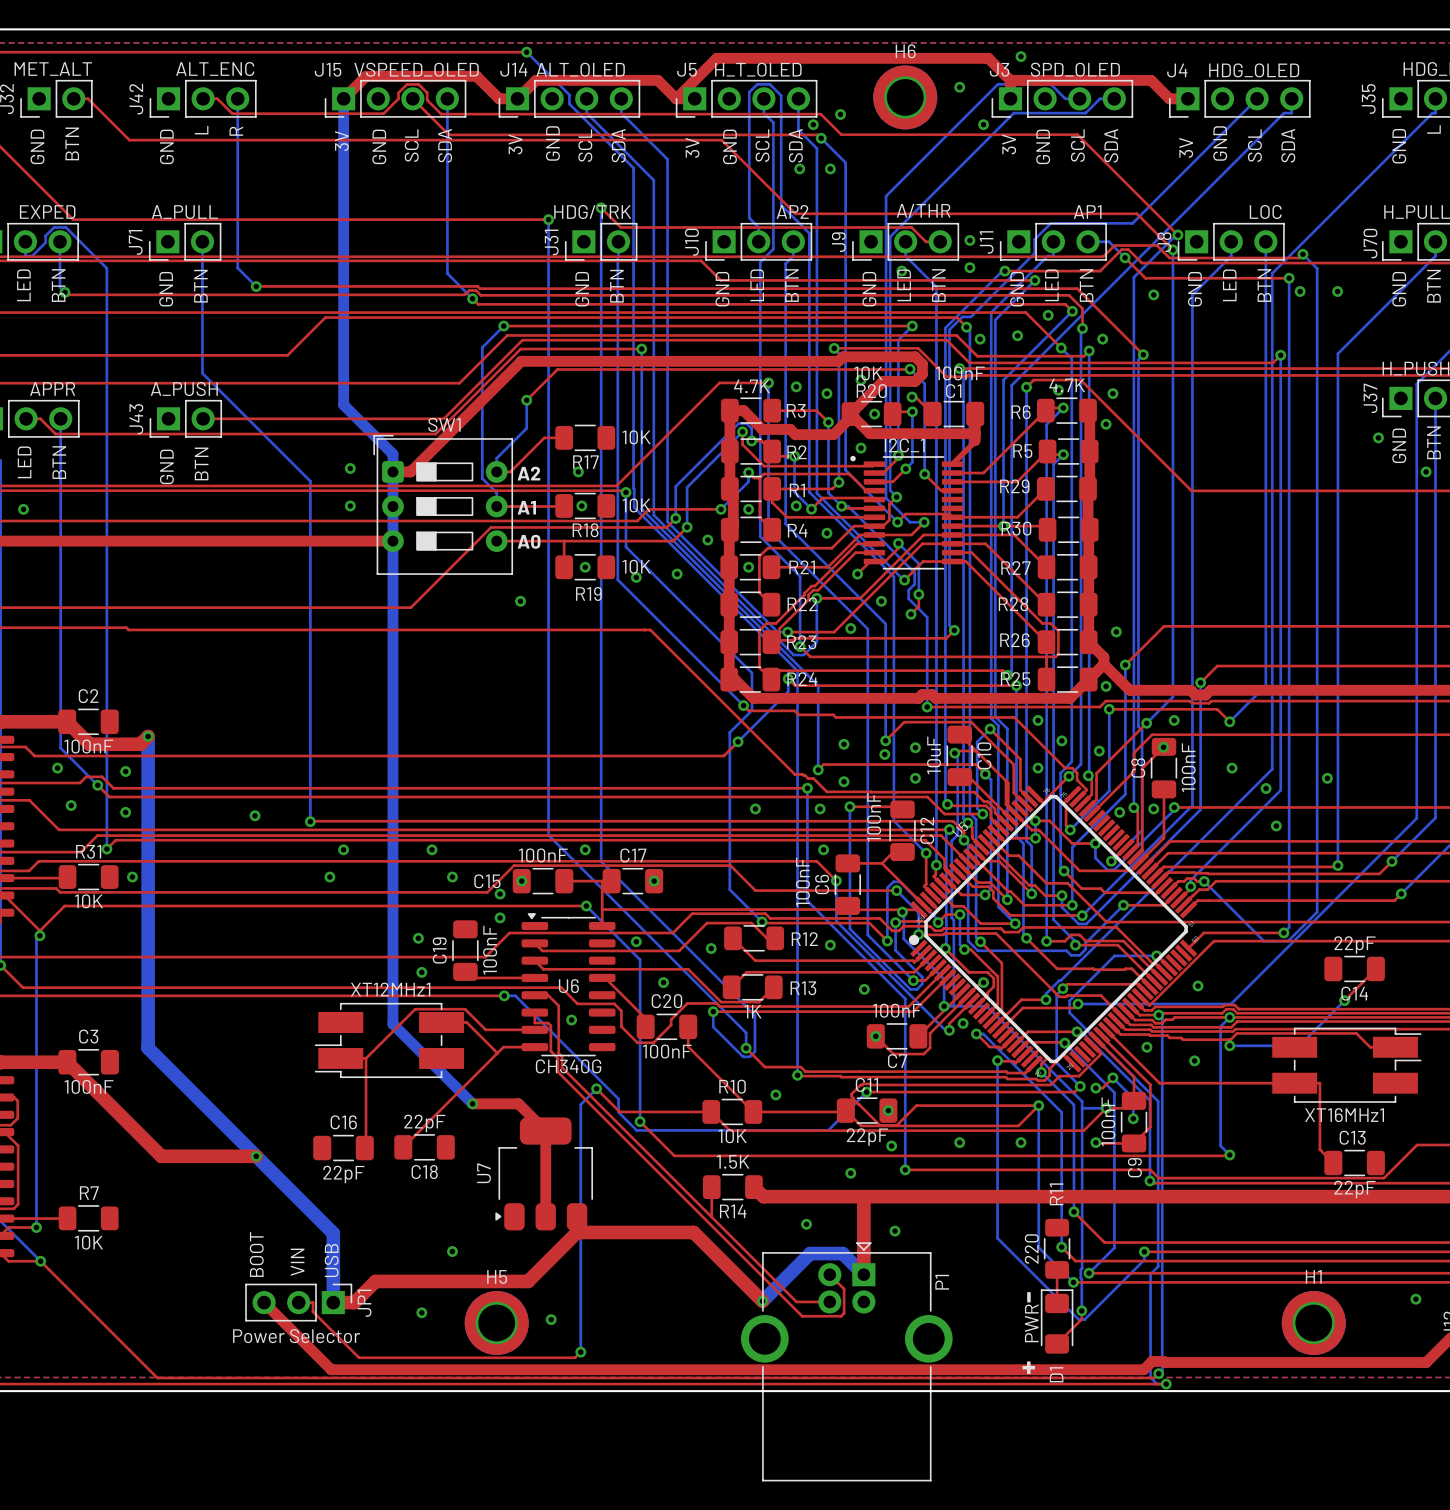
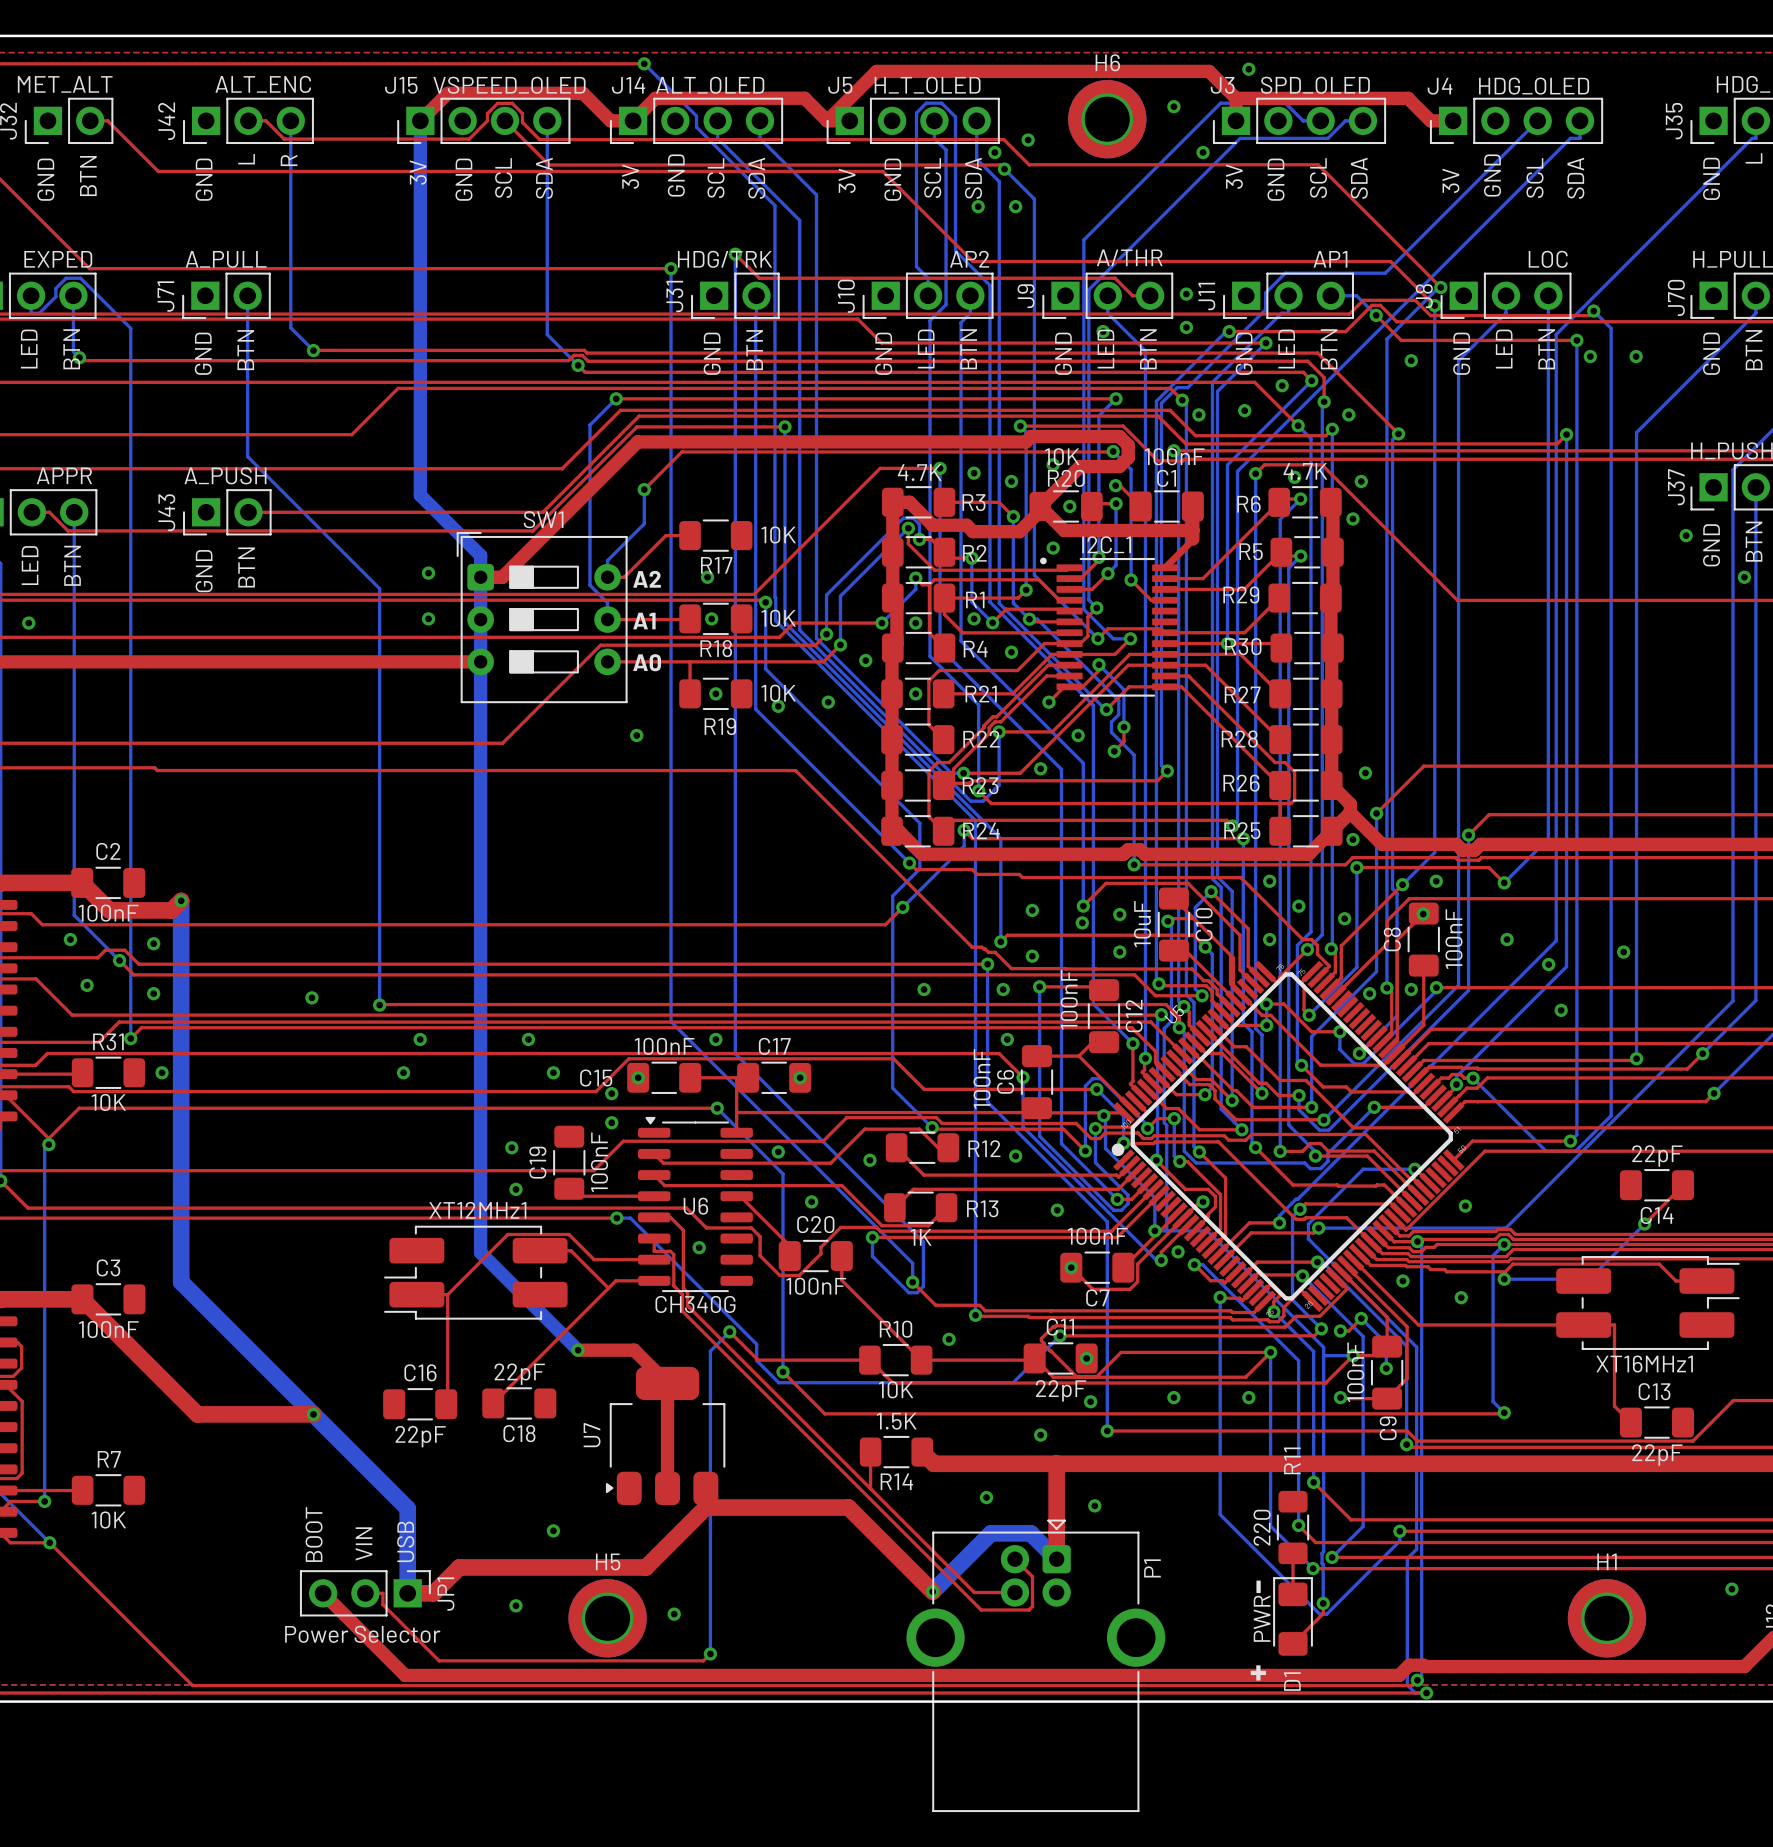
XT12MHz1 footprint: [314, 1002, 465, 1079] -> [384, 1225, 568, 1320]
XT16MHz1 footprint: [1272, 1027, 1422, 1103] -> [1556, 1256, 1740, 1350]
P1 footprint: [741, 1242, 953, 1482] -> [906, 1519, 1166, 1813]

